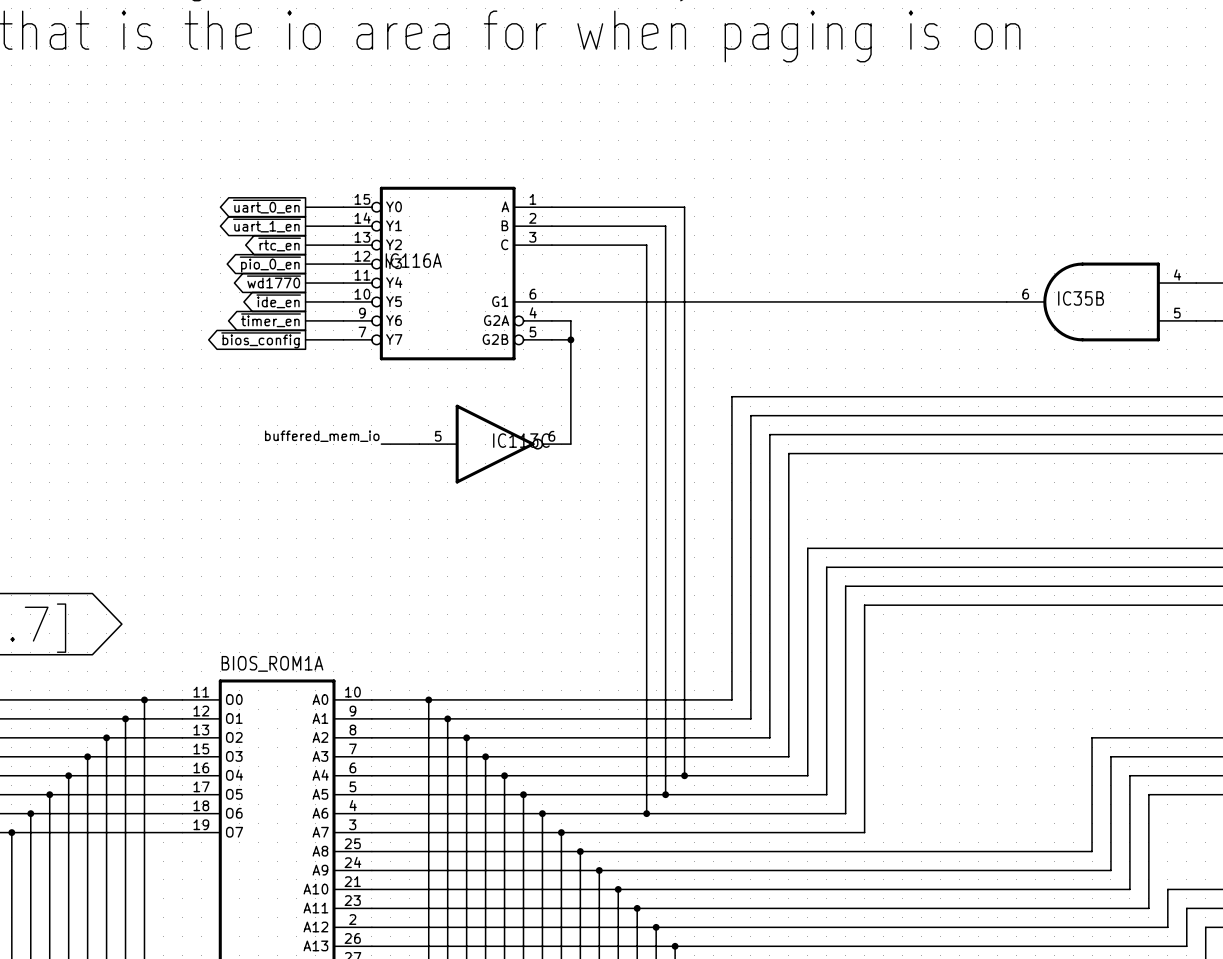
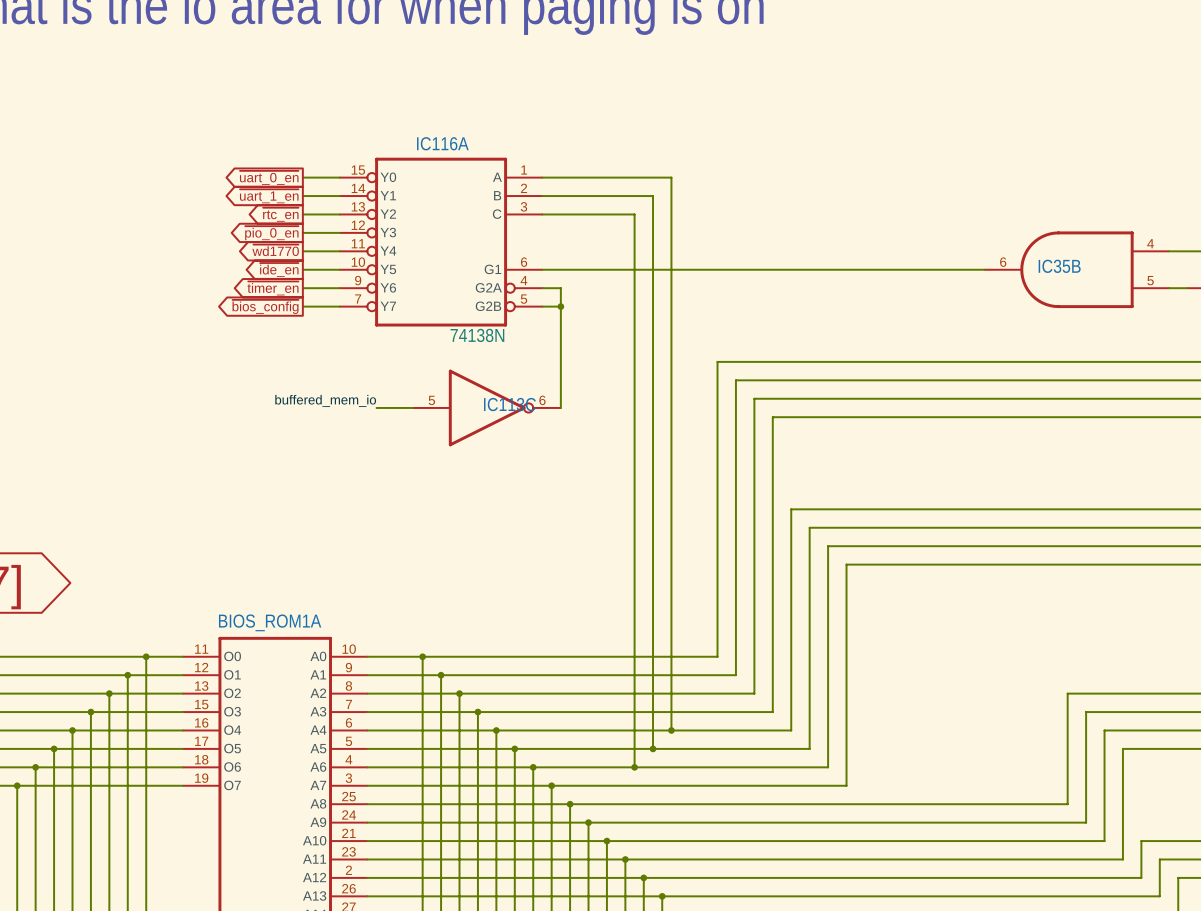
IC116A name position: IC116A (413, 260) -> IC116A (442, 143)
IC116A value: none -> 74138N (477, 335)

